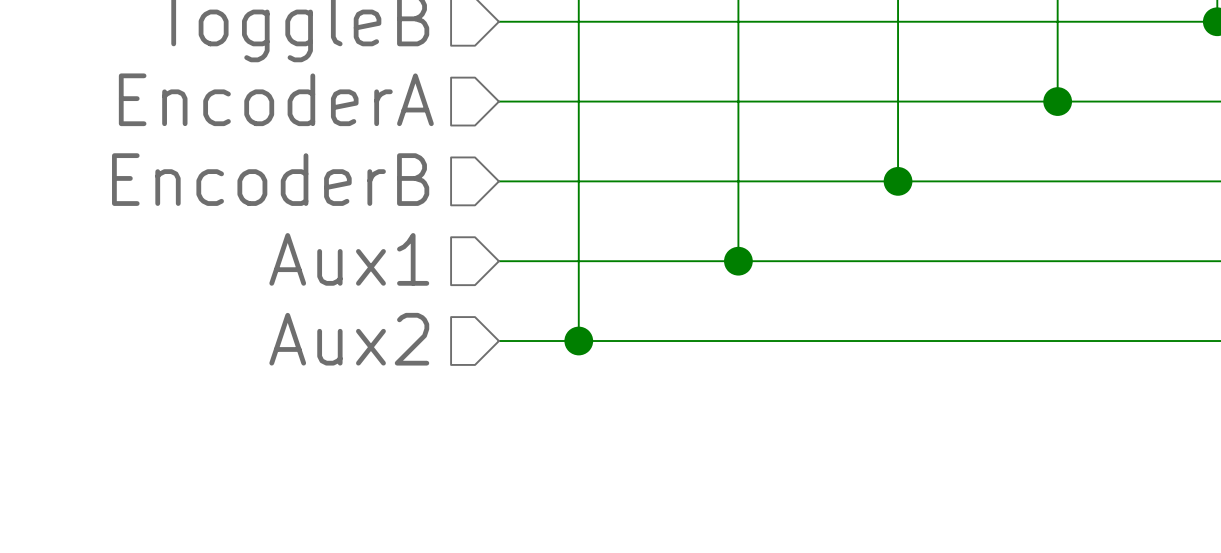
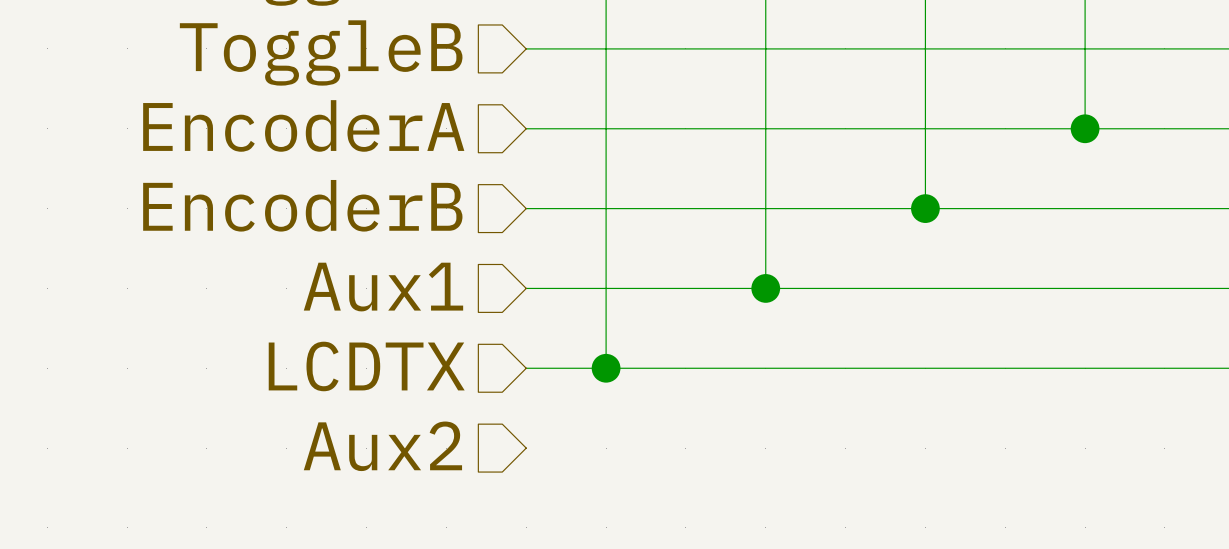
hierarchical label: Aux2 (349, 339) -> LCDTX (366, 366)
hierarchical label: none -> Aux2 (382, 446)

